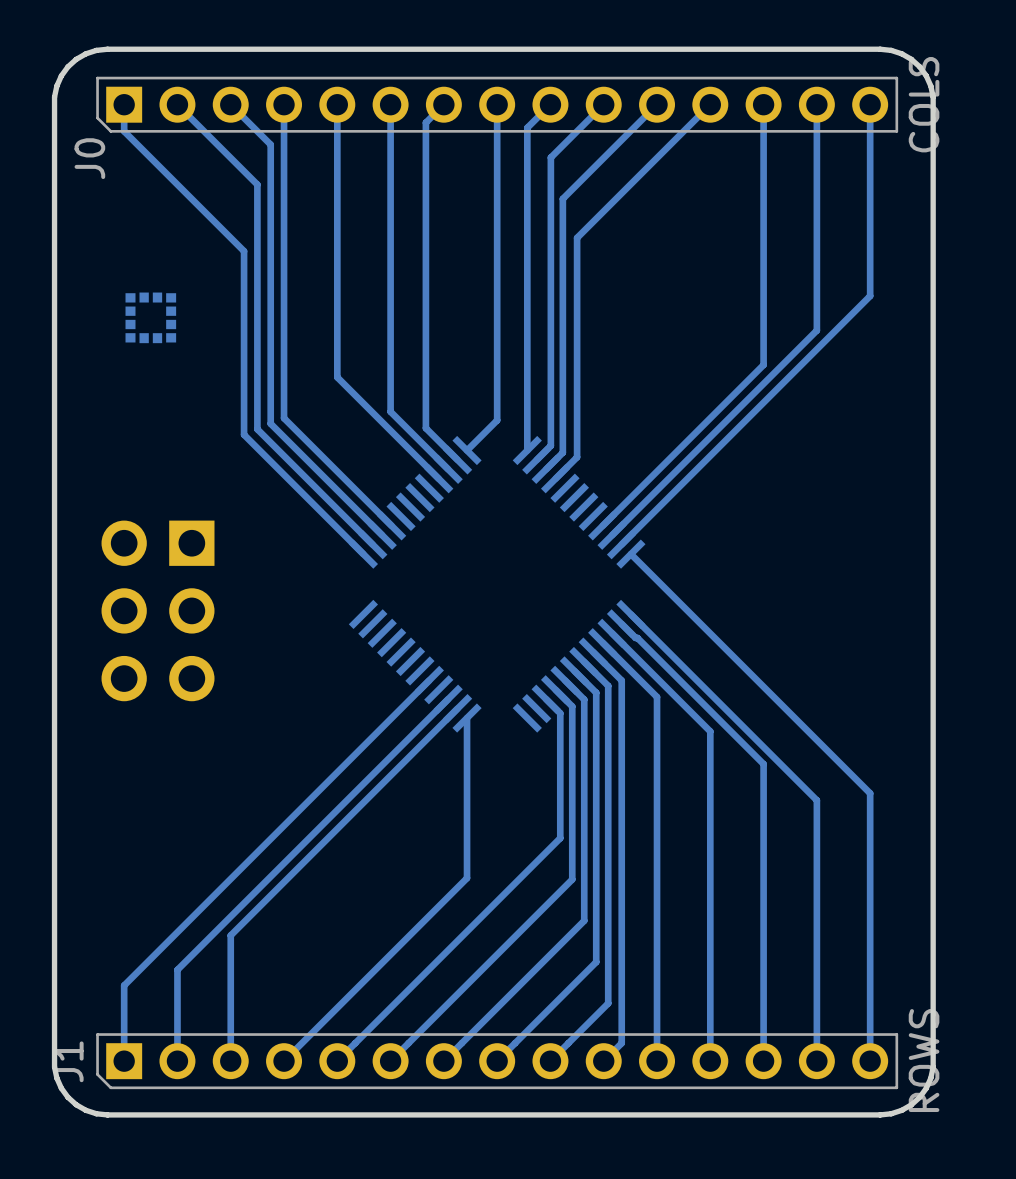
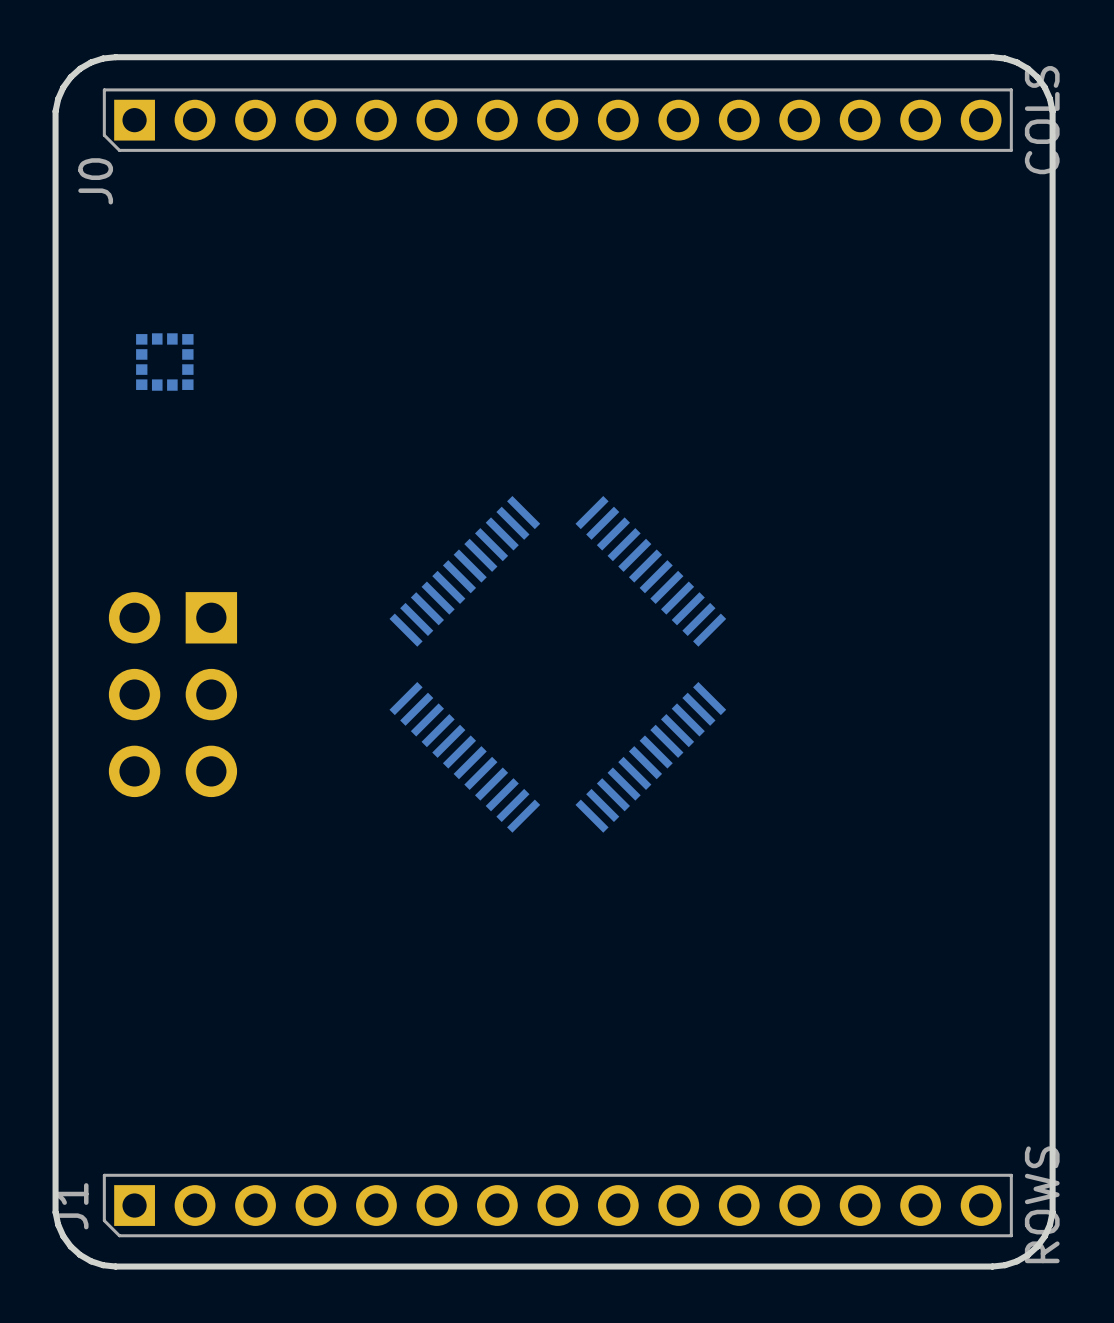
bottom track: (124, 104) (124, 131) (244, 251) (244, 434) (363, 554) -> none
bottom track: (177, 104) (257, 184) (257, 429) (372, 544) -> none
bottom track: (230, 104) (270, 144) (270, 423) (382, 535) -> none
bottom track: (284, 104) (284, 418) (391, 525) -> none
bottom track: (337, 104) (337, 377) (438, 478) -> none
bottom track: (390, 104) (390, 411) (448, 469) -> none
bottom track: (443, 104) (425, 122) (425, 428) (457, 459) -> none
bottom track: (497, 104) (497, 420) (467, 450) -> none
bottom track: (550, 104) (527, 127) (527, 450) -> none
bottom track: (603, 104) (550, 157) (550, 445) (536, 459) -> none
bottom track: (657, 104) (562, 198) (562, 452) (546, 469) -> none
bottom track: (710, 104) (577, 237) (577, 457) (555, 478) -> none
bottom track: (763, 104) (763, 364) (602, 525) -> none
bottom track: (816, 104) (816, 330) (612, 535) -> none
bottom track: (870, 104) (870, 296) (621, 544) -> none
bottom track: (630, 554) (870, 793) (870, 1061) -> none
bottom track: (630, 614) (816, 800) (816, 1061) -> none
bottom track: (621, 623) (763, 764) (763, 1061) -> none
bottom track: (612, 633) (710, 731) (710, 1061) -> none
bottom track: (602, 642) (657, 697) (657, 1061) -> none
bottom track: (593, 652) (621, 680) (621, 1043) (603, 1061) -> none
bottom track: (583, 661) (608, 685) (608, 1003) (550, 1061) -> none
bottom track: (574, 670) (596, 692) (596, 962) (497, 1061) -> none
bottom track: (429, 680) (124, 985) (124, 1061) -> none
bottom track: (564, 680) (584, 699) (584, 920) (443, 1061) -> none
bottom track: (555, 689) (572, 706) (572, 879) (390, 1061) -> none
bottom track: (448, 699) (177, 969) (177, 1061) -> none
bottom track: (546, 699) (560, 713) (560, 838) (337, 1061) -> none
bottom track: (457, 708) (230, 935) (230, 1061) -> none
bottom track: (467, 718) (467, 878) (284, 1061) -> none

